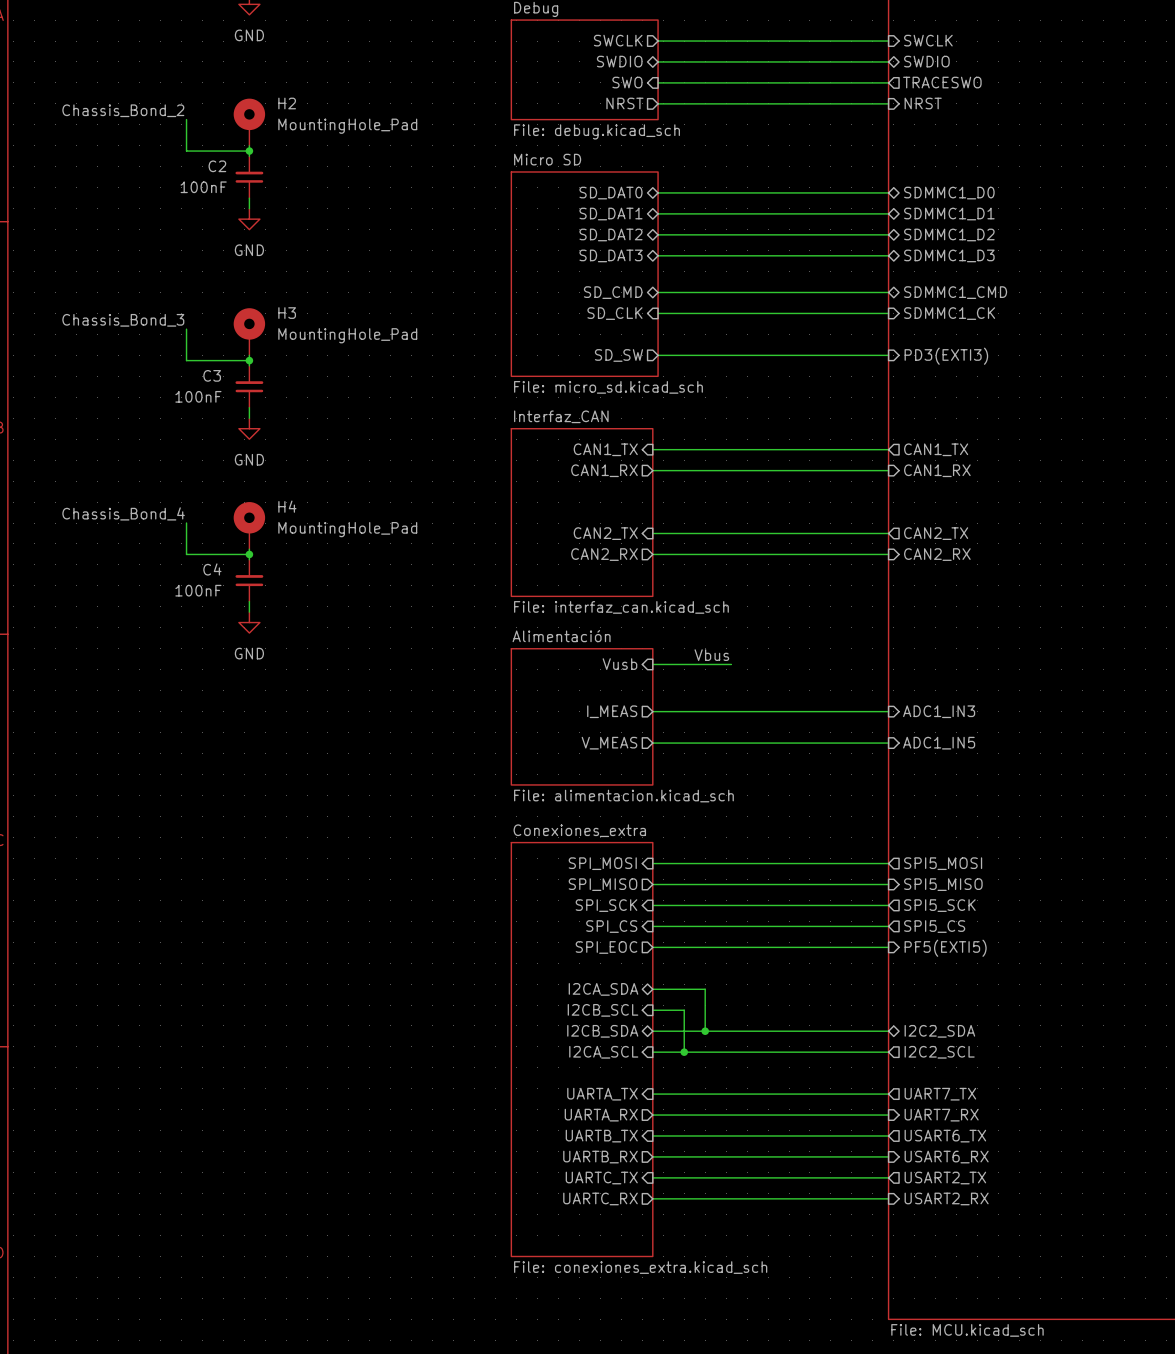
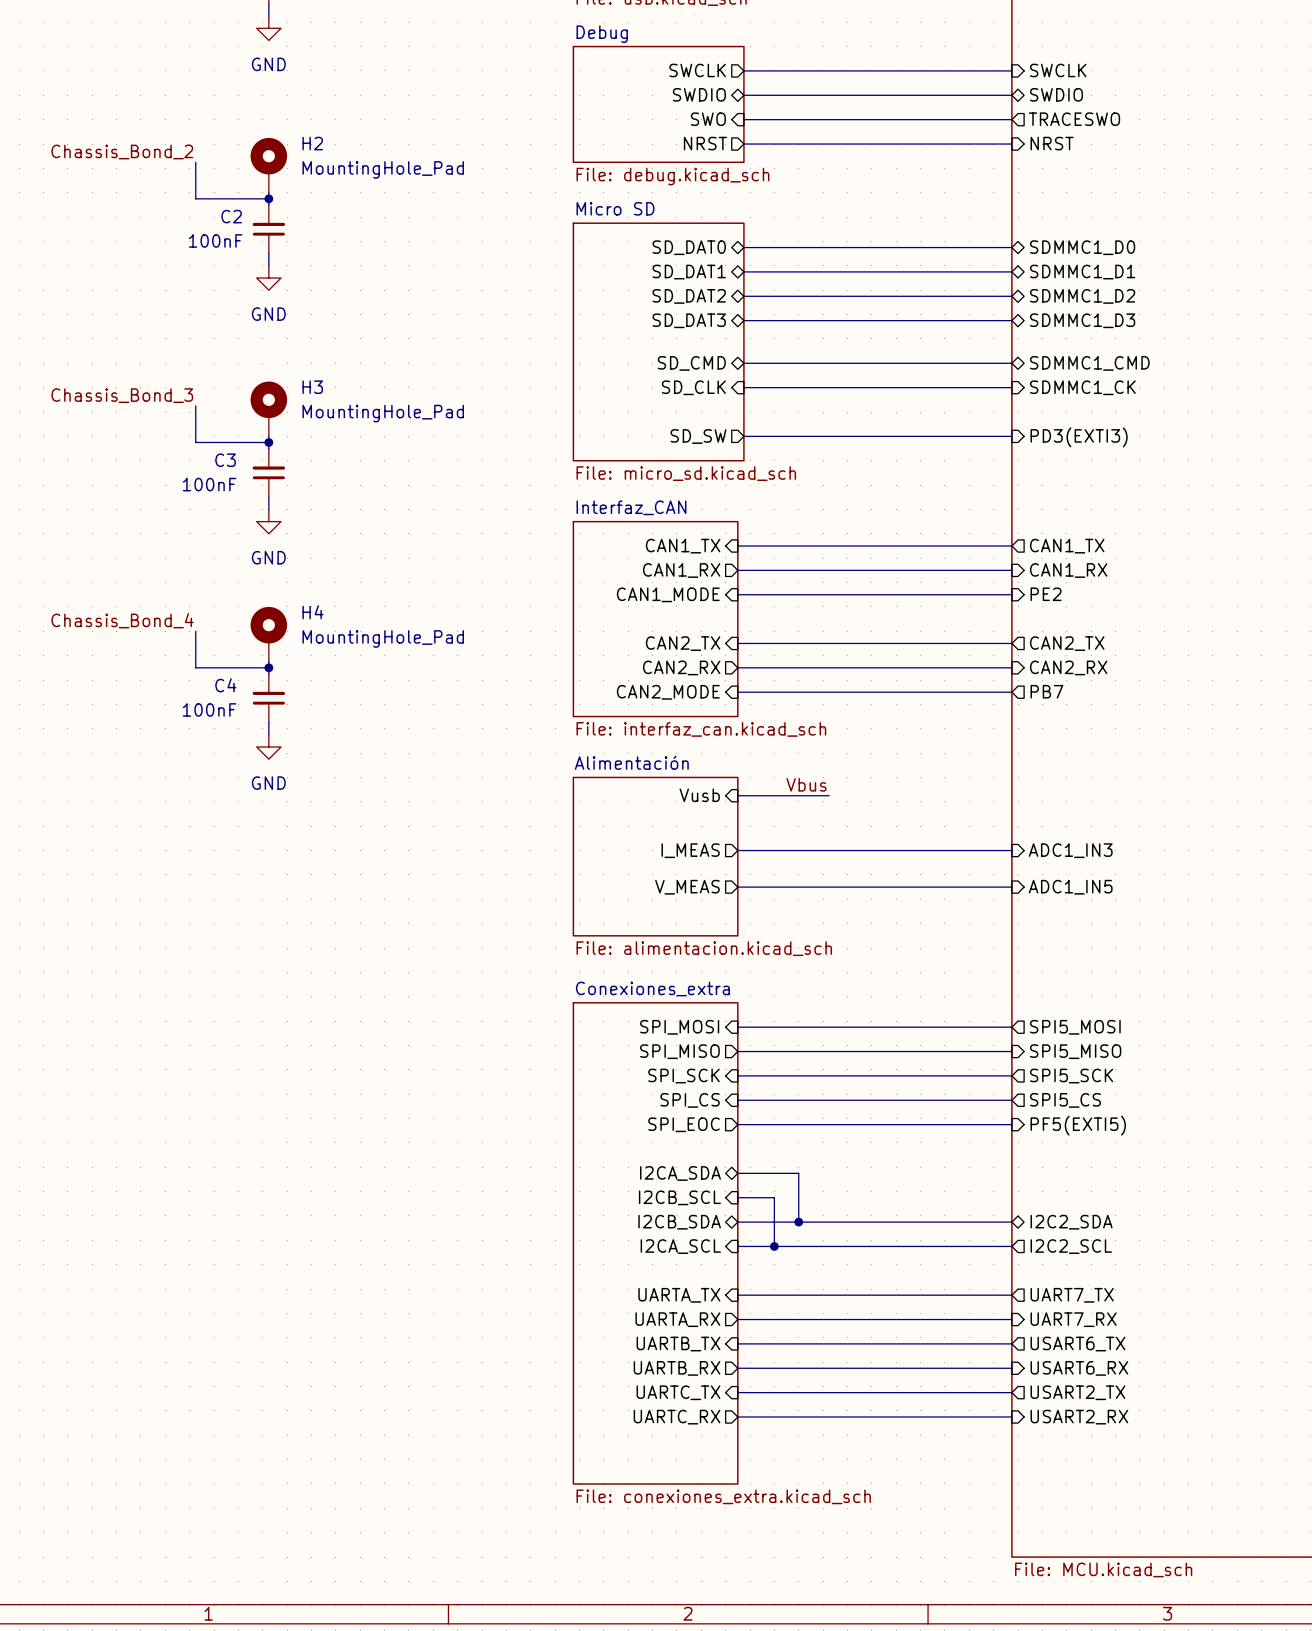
sheet pin: none -> CAN1_MODE (668, 594)
wire: none -> (737, 594) (1011, 594)
sheet pin: none -> PE2 (1046, 594)
sheet pin: none -> CAN2_MODE (668, 692)
wire: none -> (737, 692) (1011, 692)
sheet pin: none -> PB7 (1046, 691)

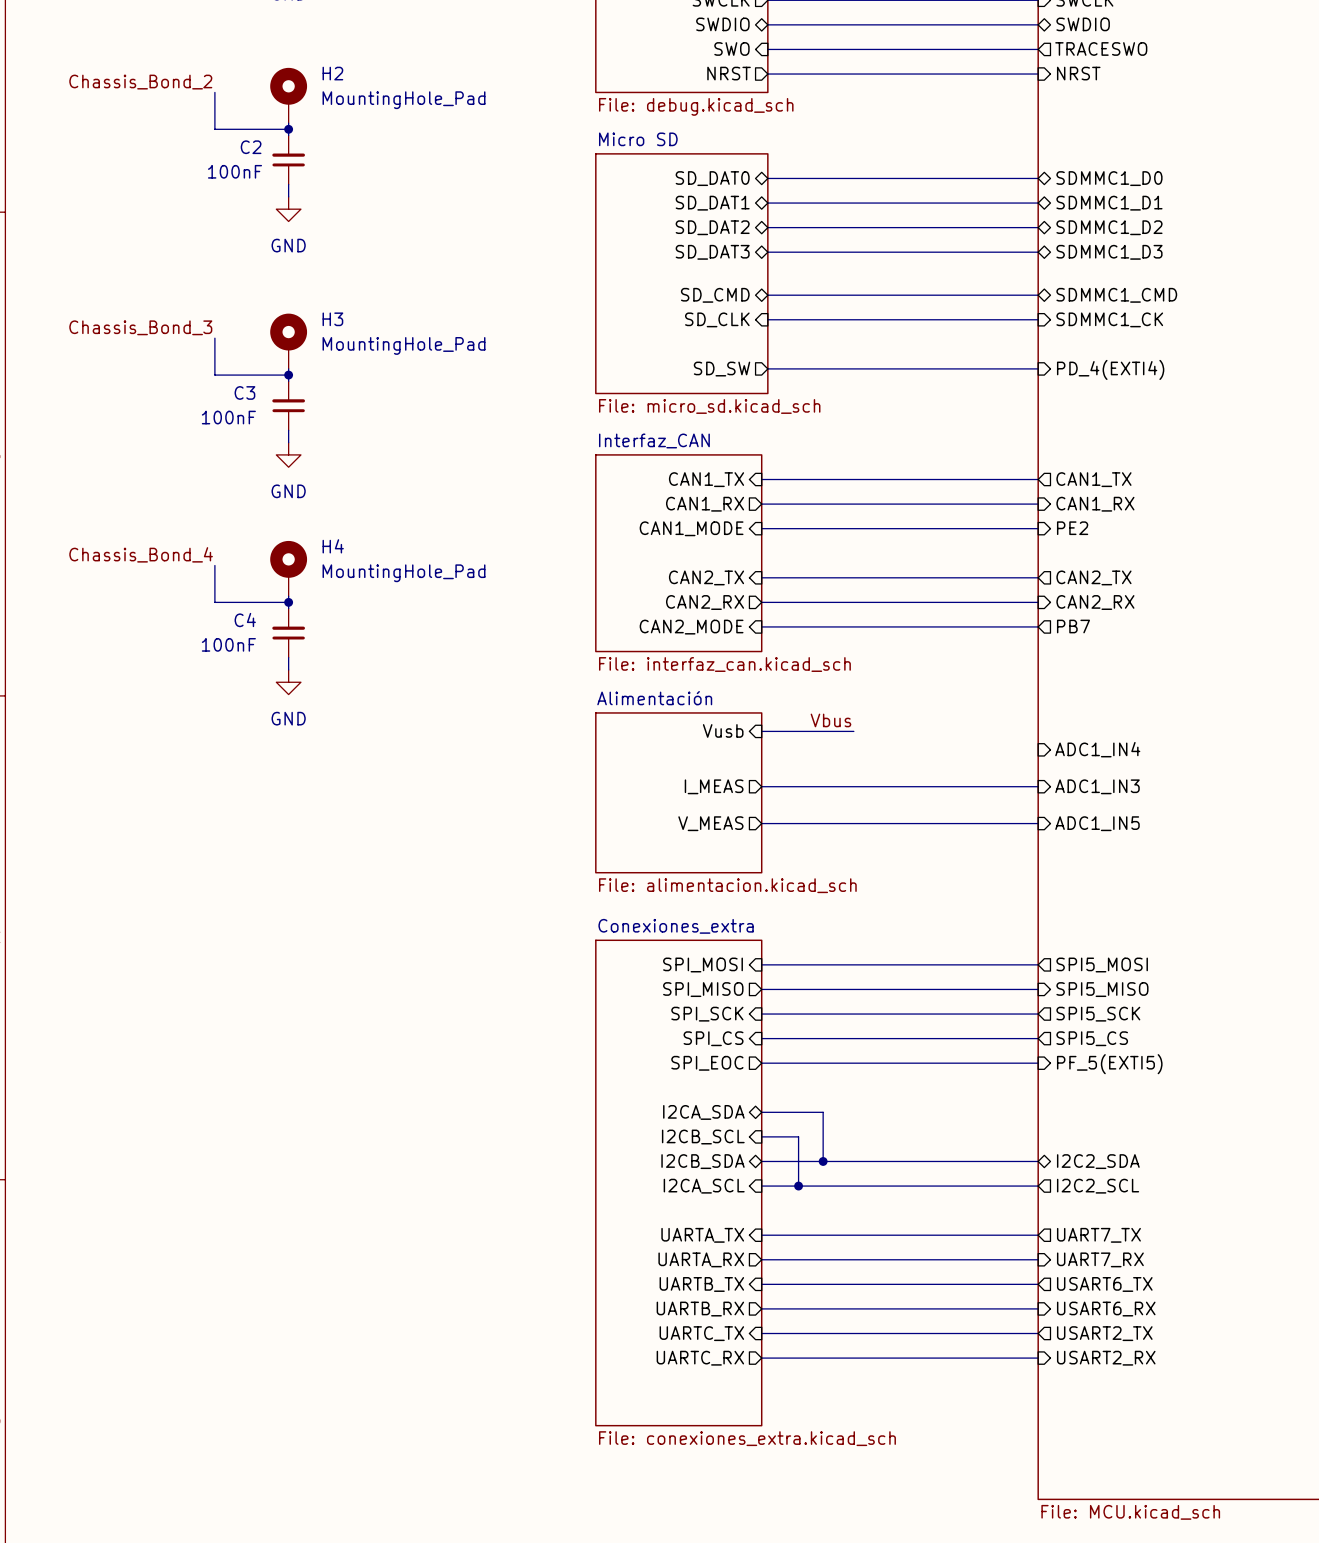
sheet pin: PD3(EXTI3) (1079, 437) -> PD_4(EXTI4) (1110, 369)
sheet pin: none -> ADC1_IN4 (1097, 749)
sheet pin: PF5(EXTI5) (1078, 1125) -> PF_5(EXTI5) (1109, 1064)

